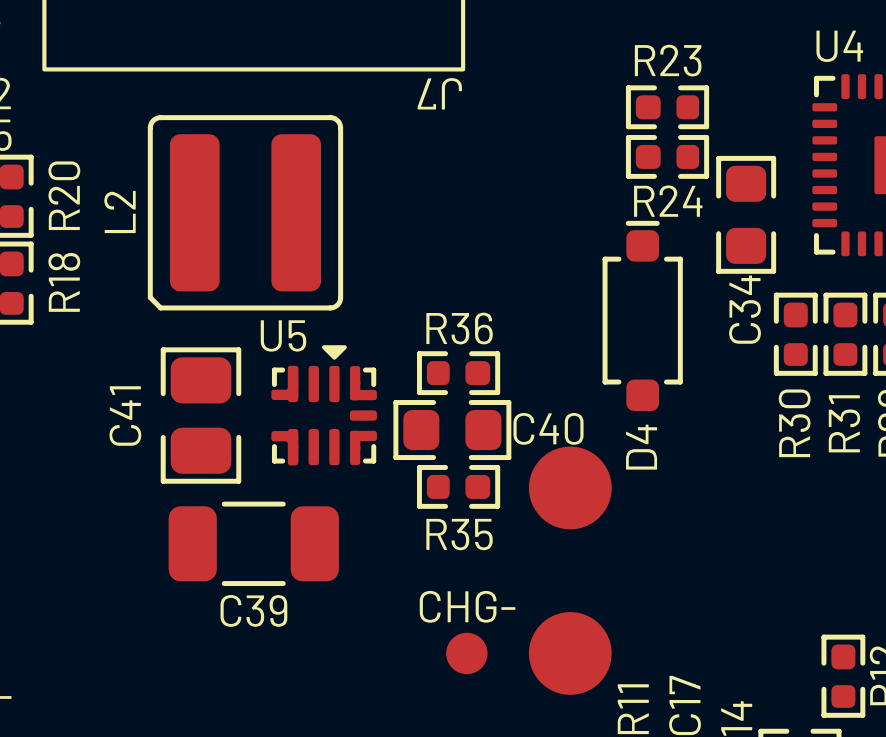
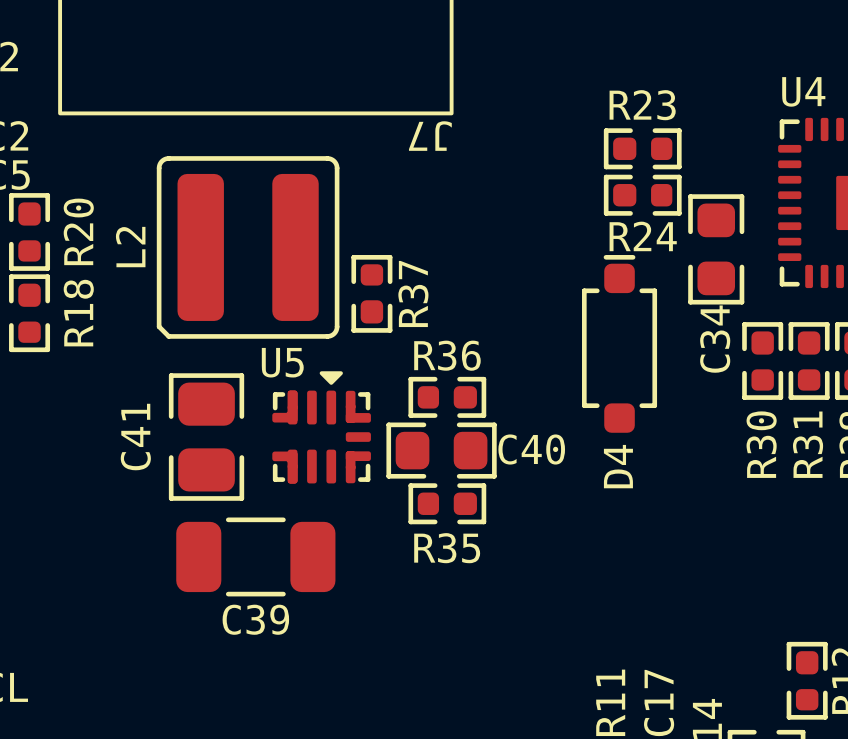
R37: none -> (371, 293)
part: (570, 570) -> none
part: CHG- (466, 653) -> none

